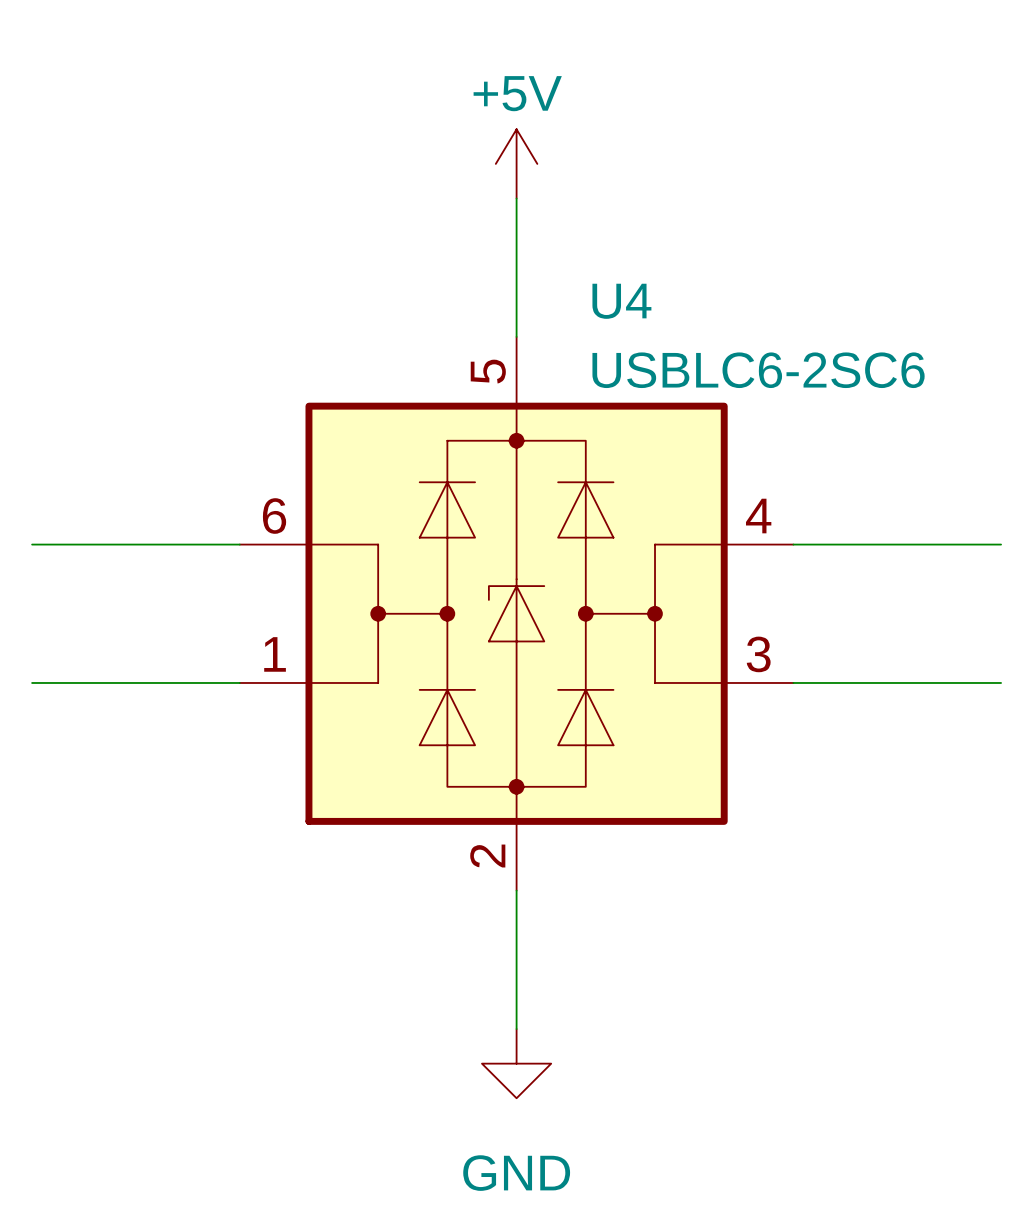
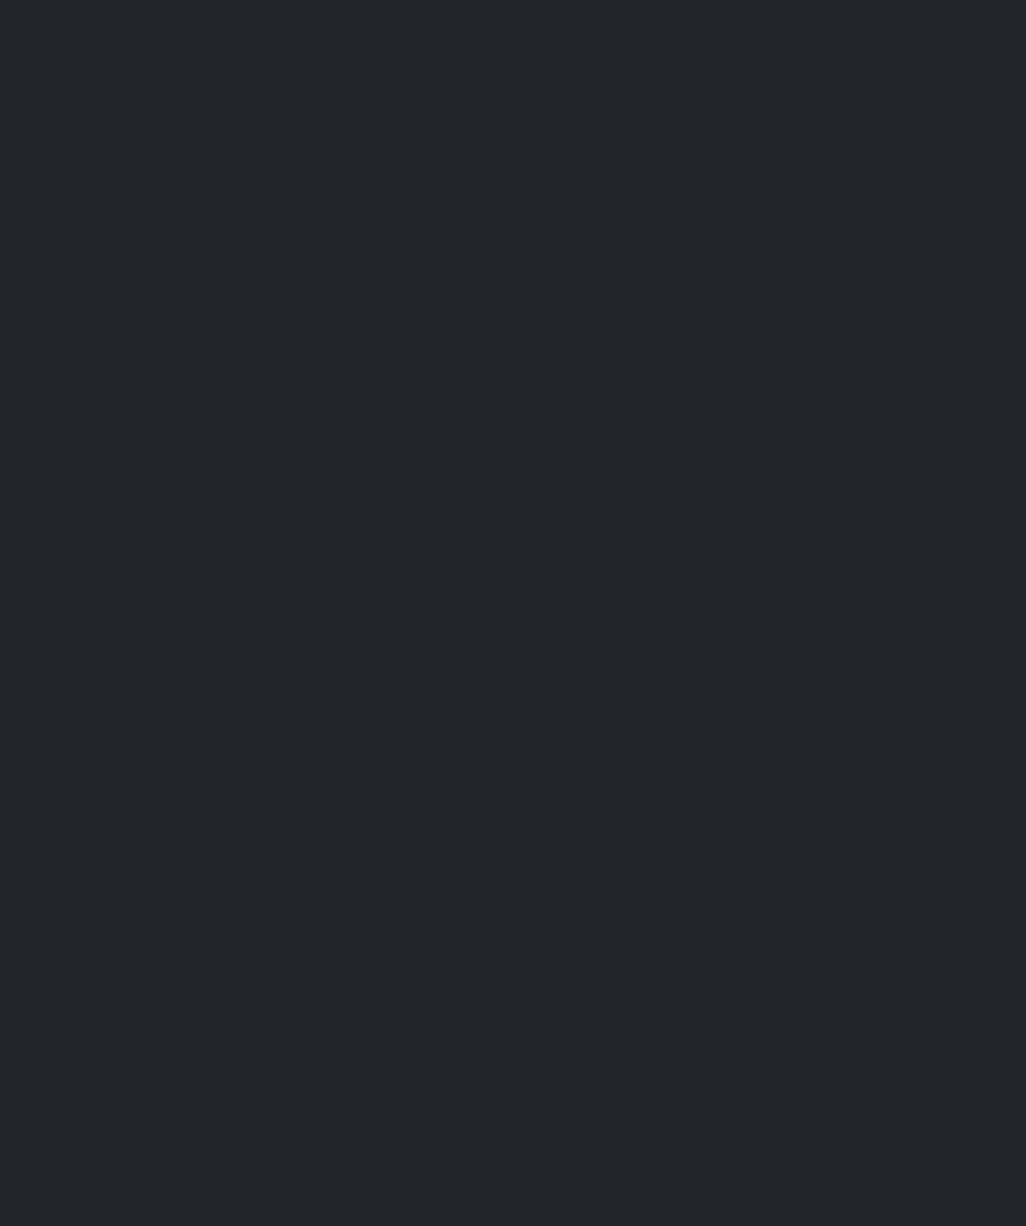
power symbol: +5V (516, 163) -> none
wire: (516, 198) (516, 336) -> none
wire: (32, 544) (239, 544) -> none
wire: (793, 544) (1001, 544) -> none
U4: USBLC6-2SC6 (516, 613) -> none
wire: (32, 682) (239, 682) -> none
wire: (793, 682) (1001, 682) -> none
wire: (516, 890) (516, 1029) -> none
power symbol: GND (516, 1063) -> none

